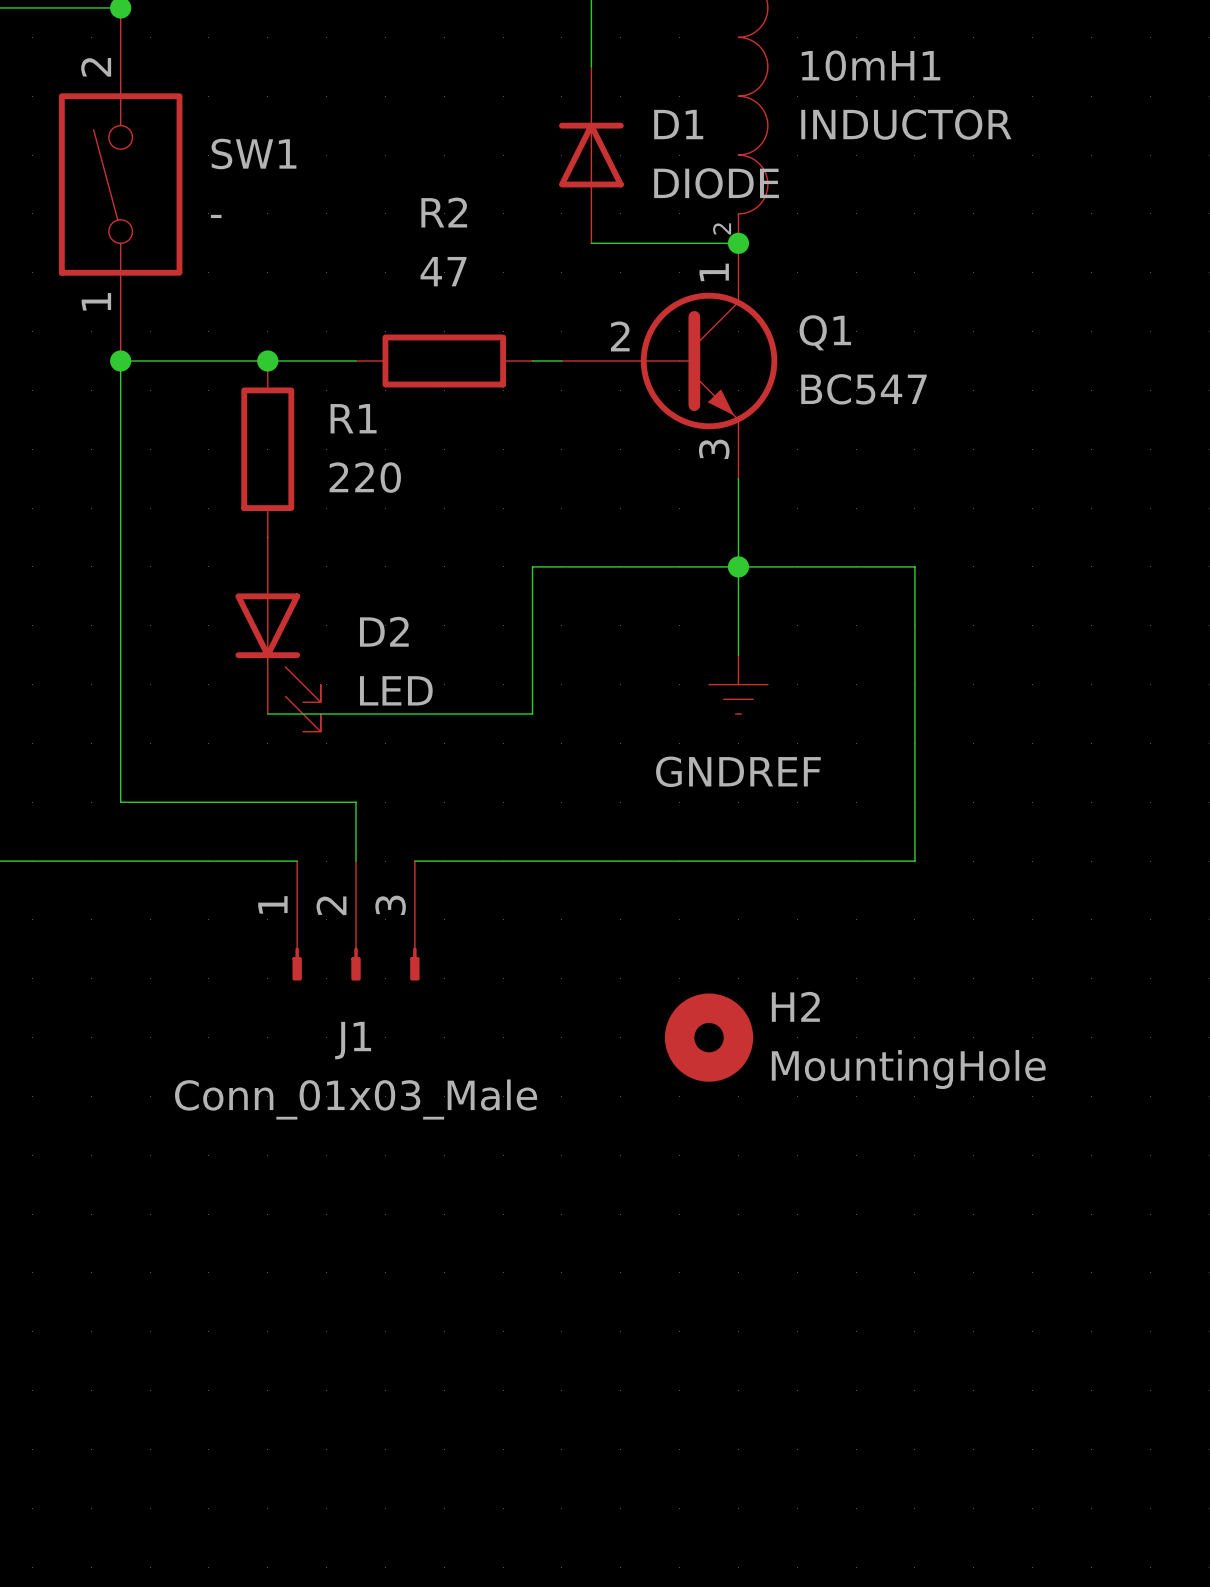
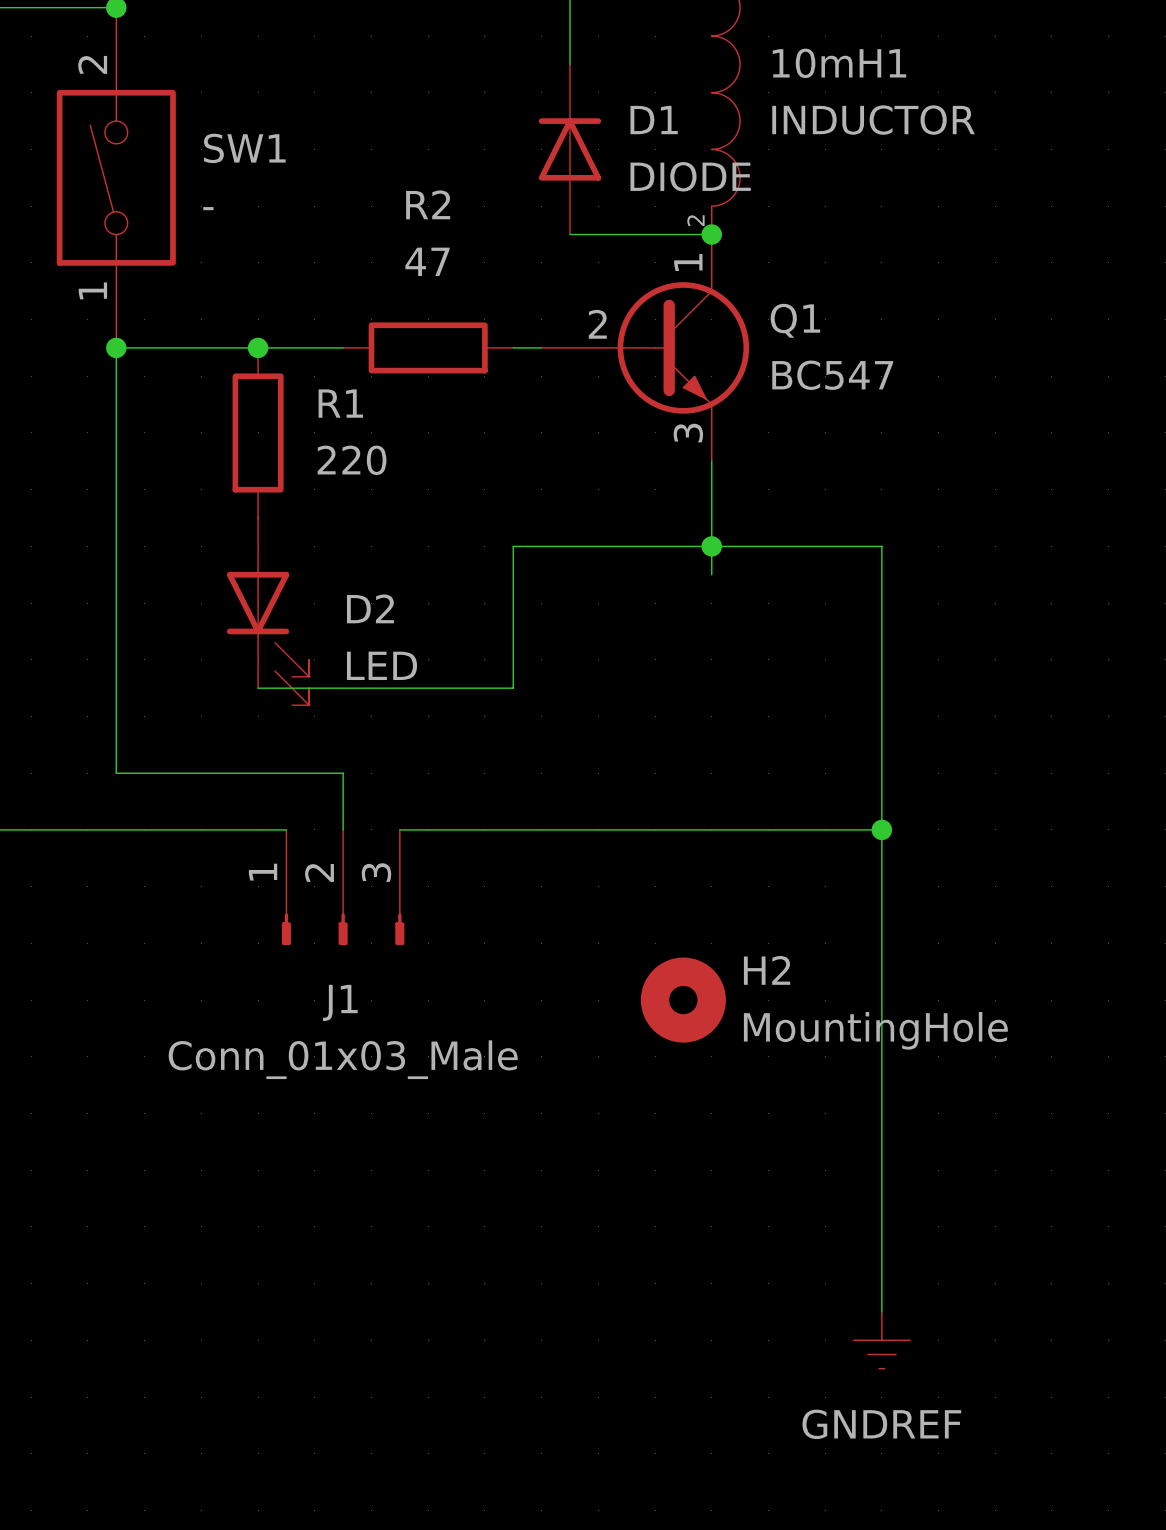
wire: (738, 596) (738, 655) -> none
power symbol: GNDREF (738, 684) -> none
wire: none -> (881, 829) (881, 1311)
junction: none -> (881, 829)
power symbol: none -> GNDREF (881, 1340)

